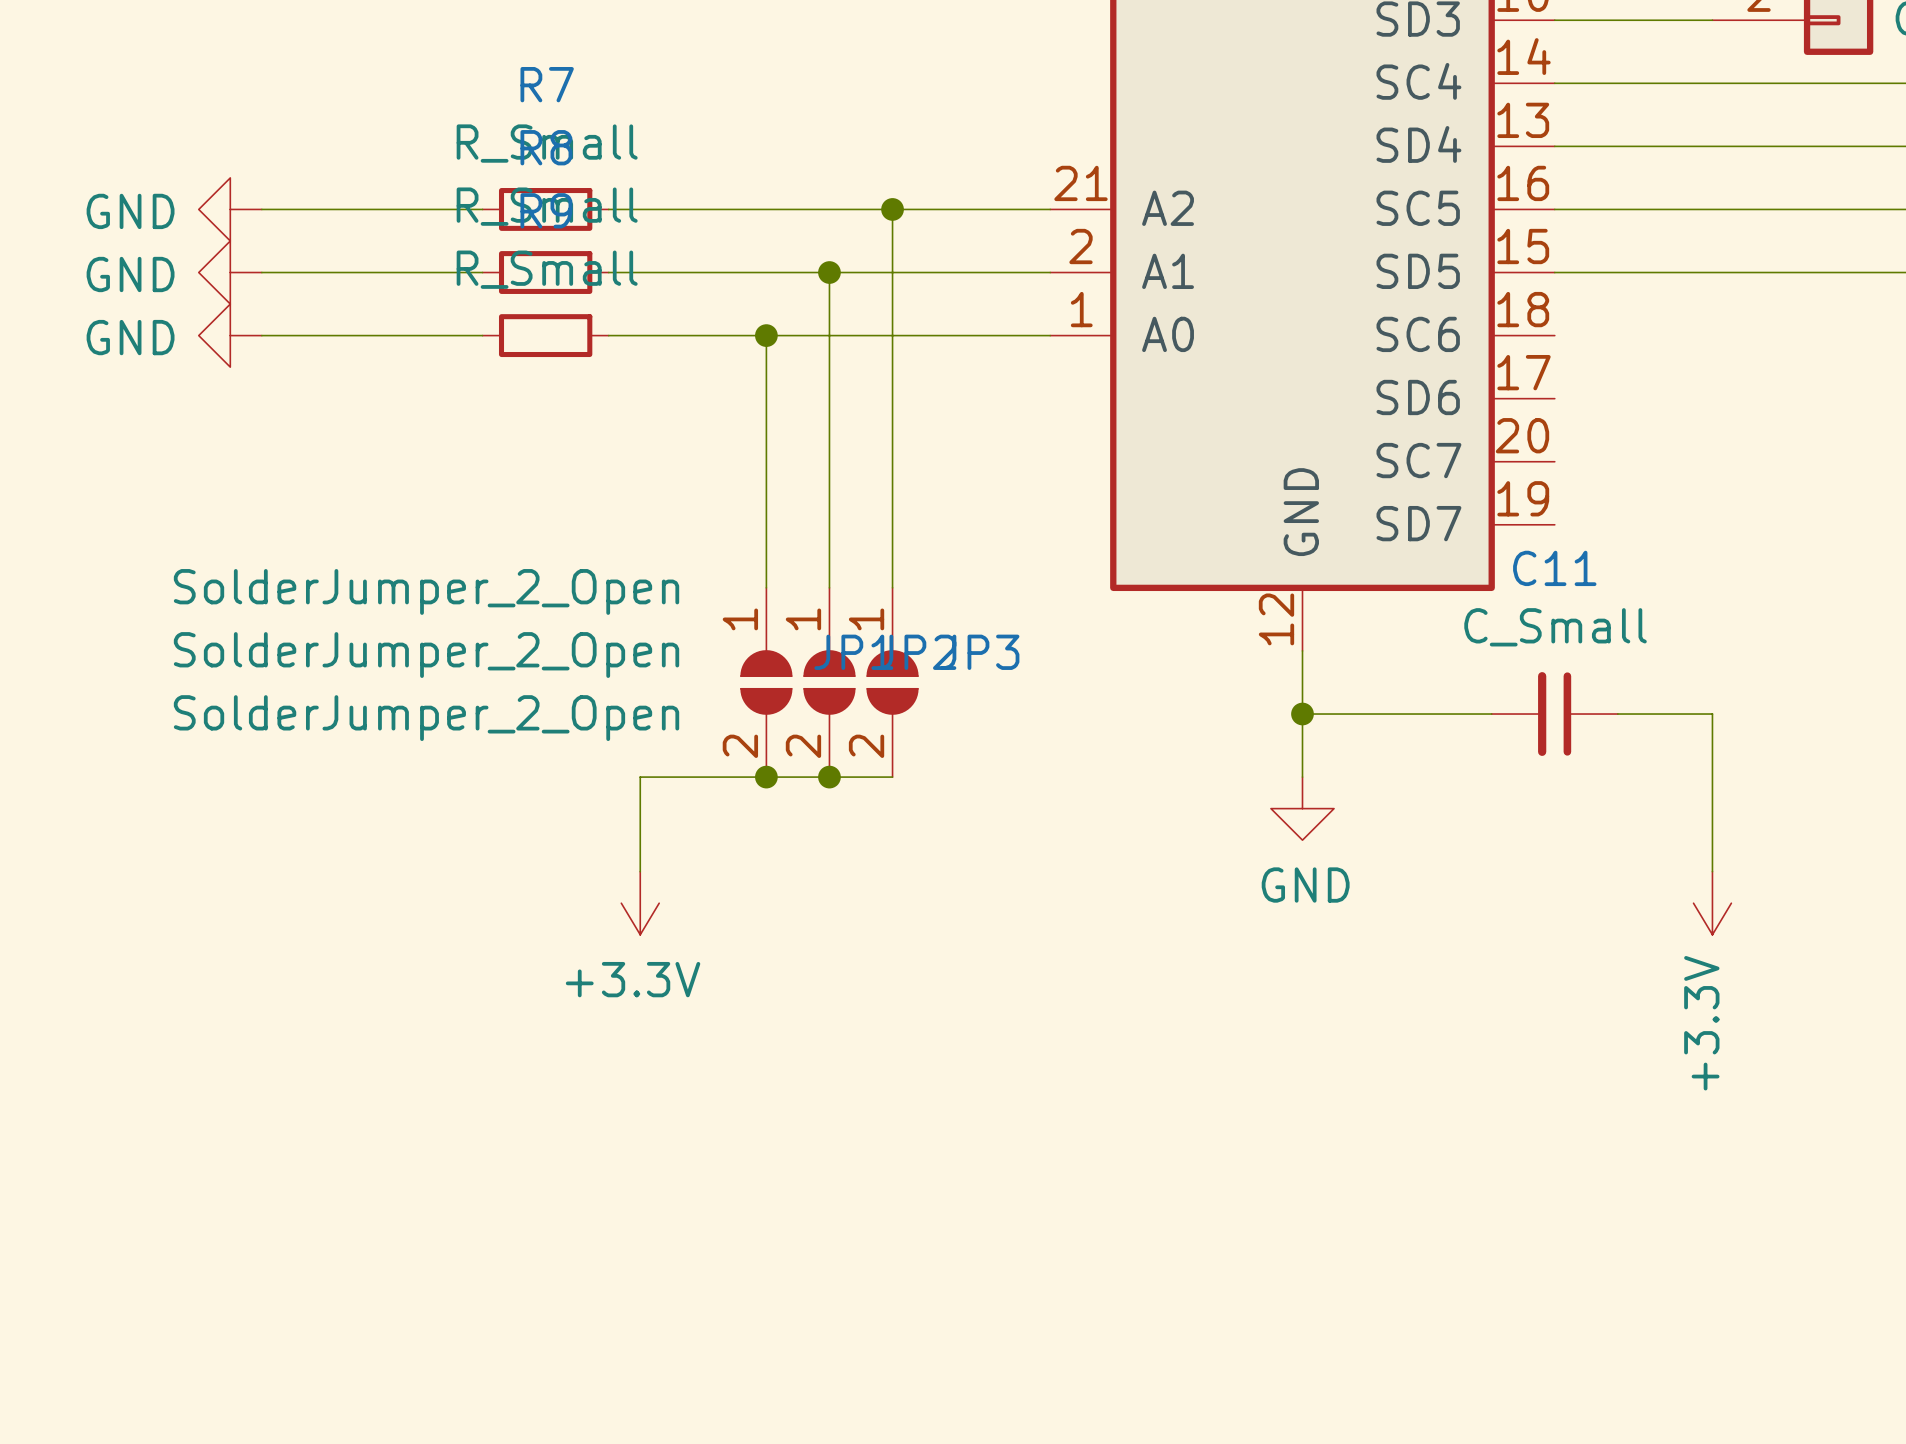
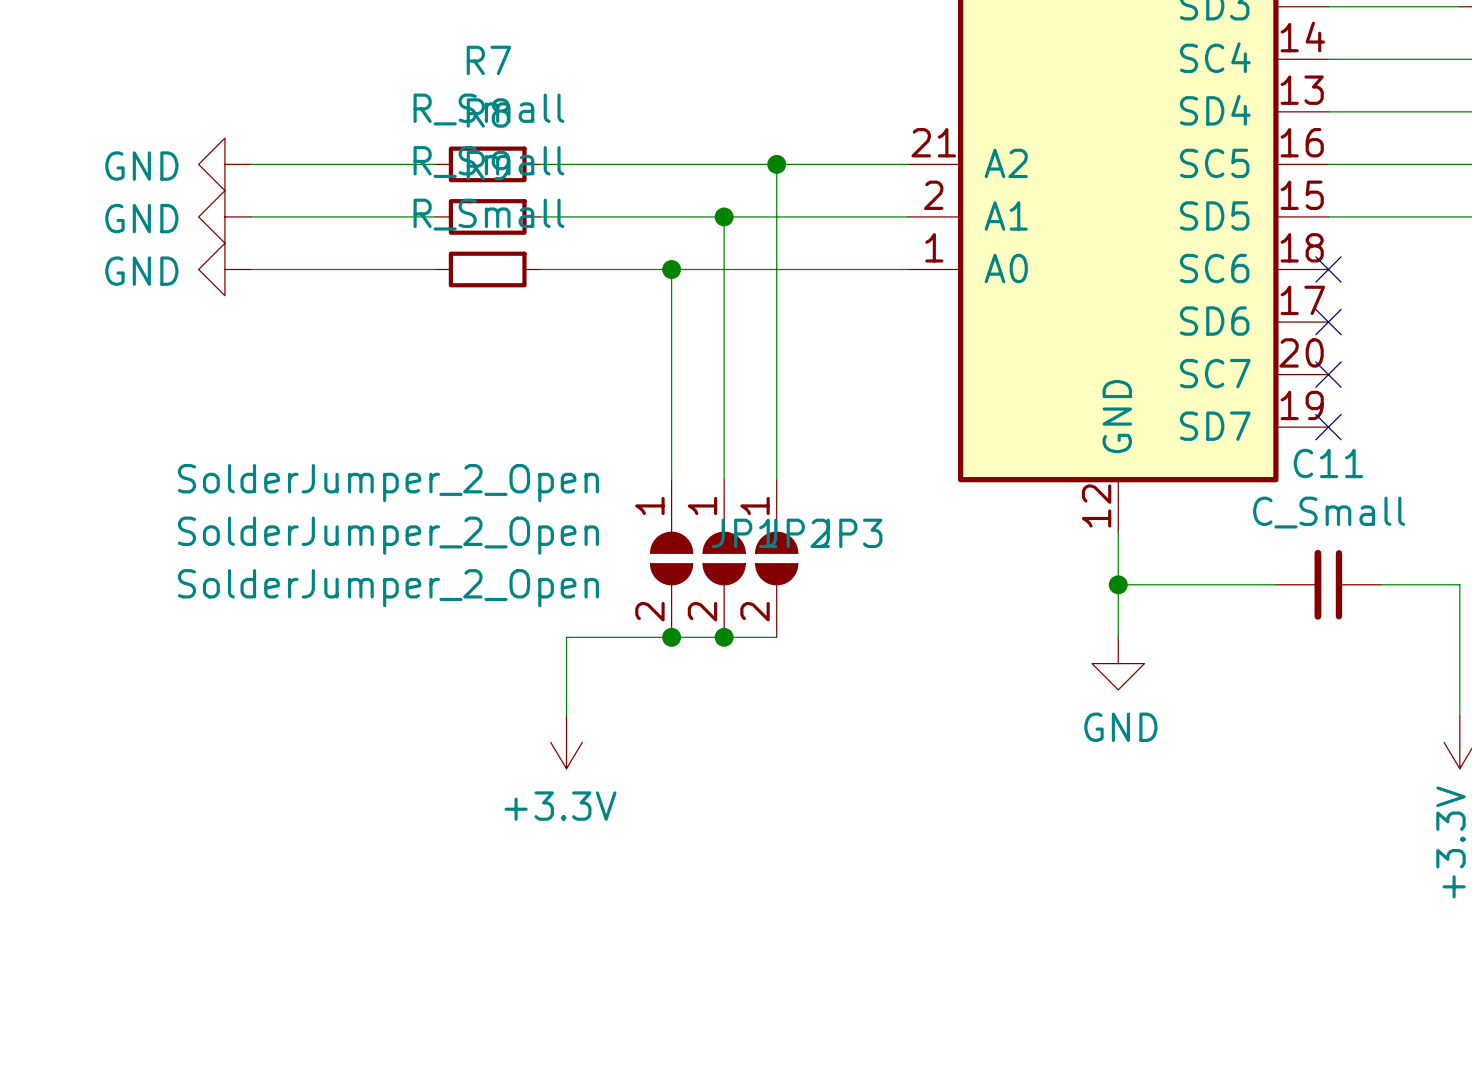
no-connect mark: none -> (1328, 269)
no-connect mark: none -> (1328, 322)
no-connect mark: none -> (1328, 374)
no-connect mark: none -> (1328, 427)

